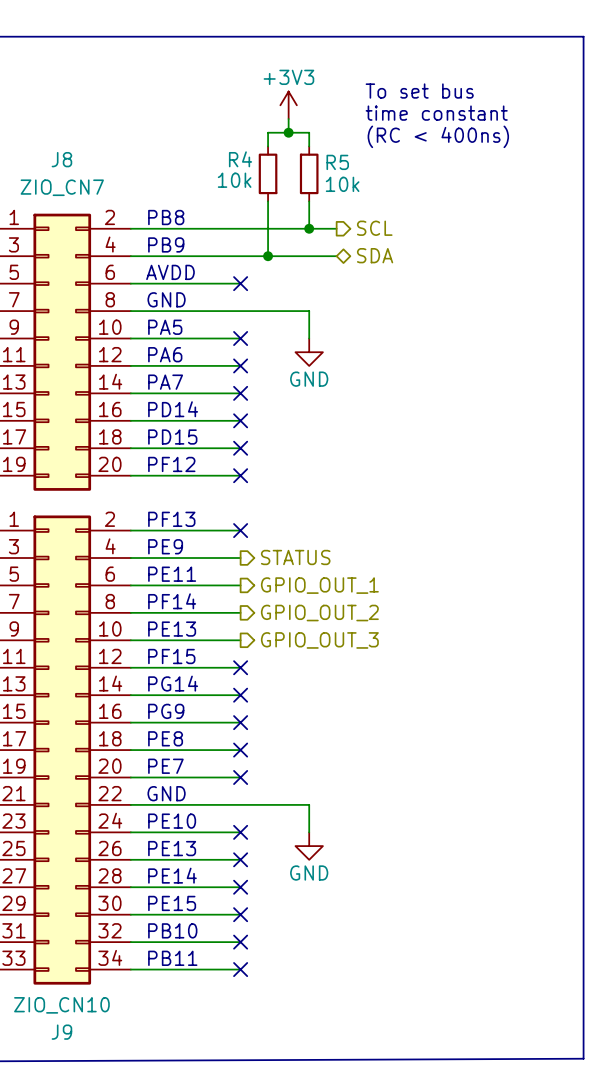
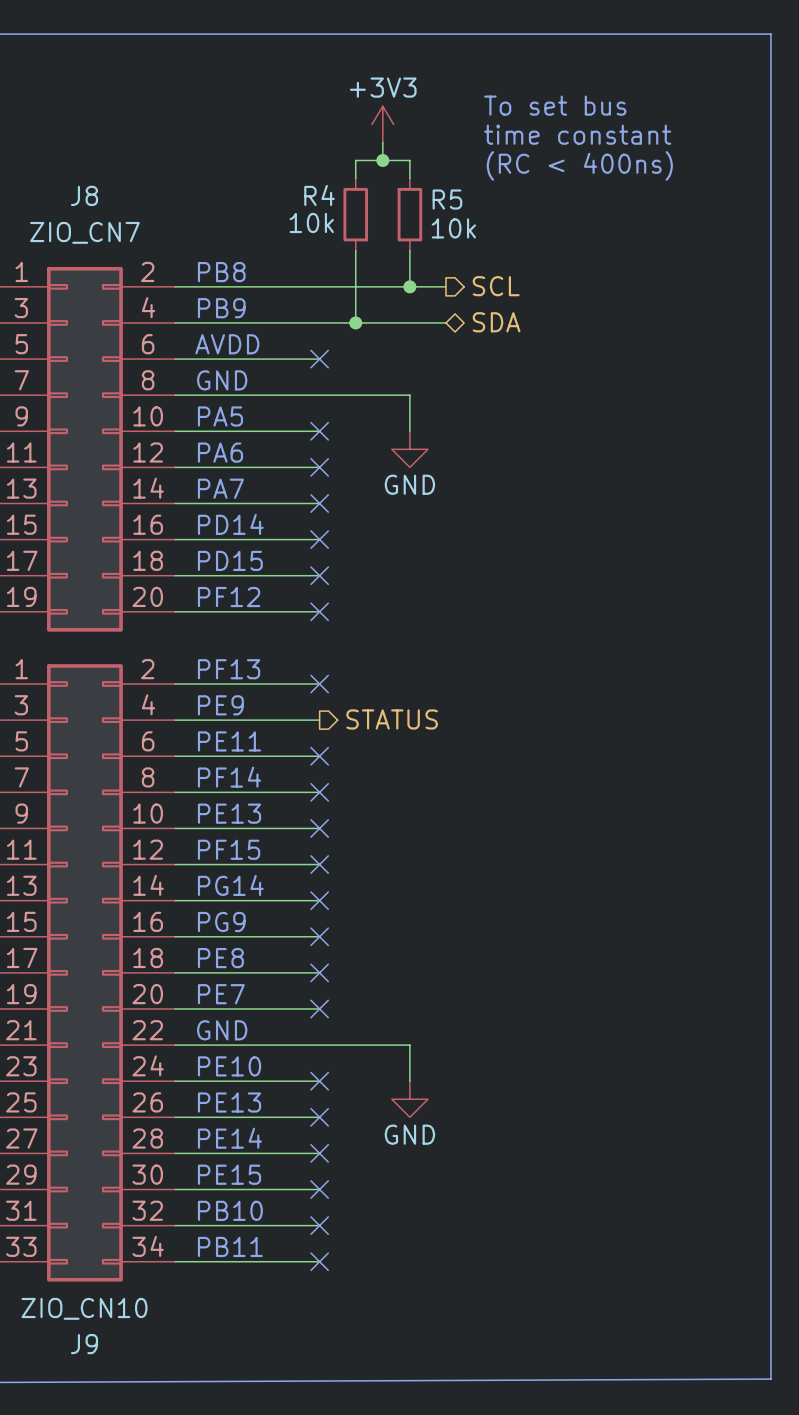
no-connect mark: none -> (319, 756)
hierarchical label: GPIO_OUT_1 (319, 585) -> none
no-connect mark: none -> (319, 792)
hierarchical label: GPIO_OUT_2 (319, 613) -> none
no-connect mark: none -> (319, 828)
hierarchical label: GPIO_OUT_3 (319, 640) -> none

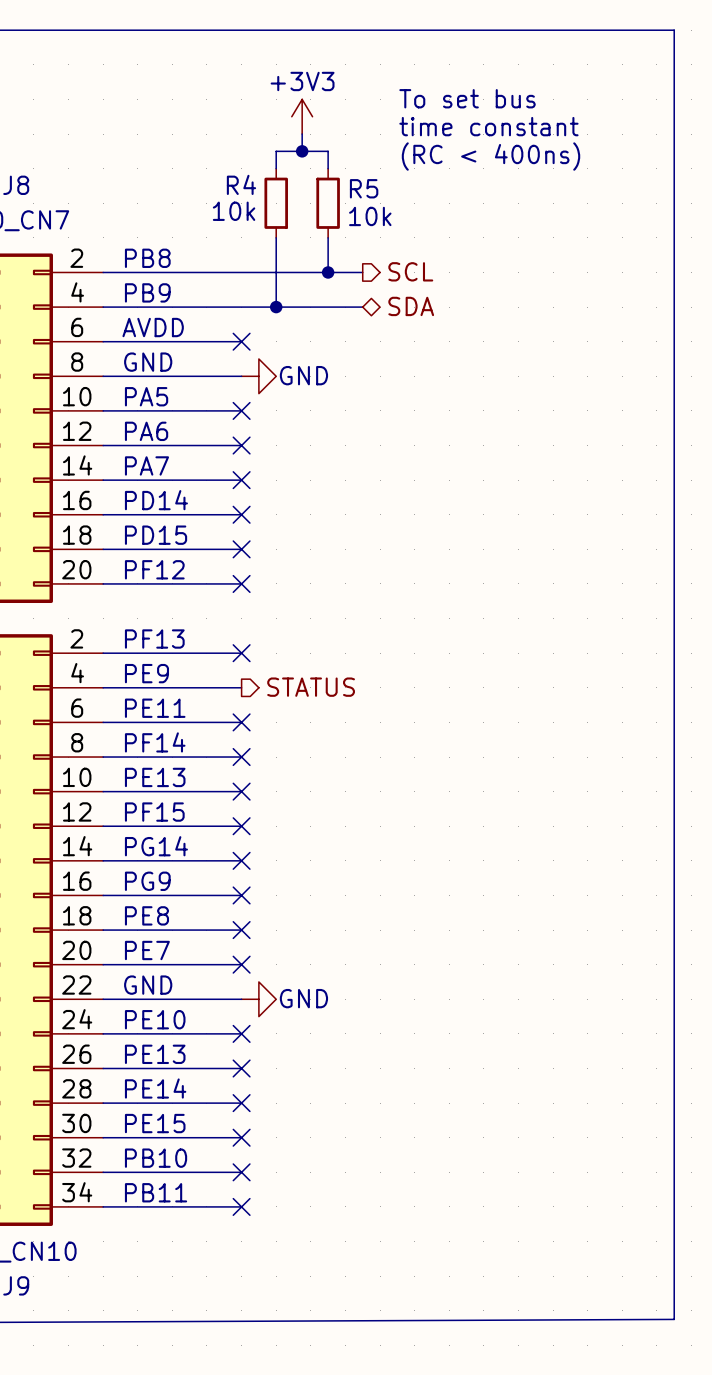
wire: (319, 395) (409, 395) (409, 431) -> none
power symbol rotation: 0° (409, 449) -> 90° counterclockwise (258, 376)
power symbol position: GND (409, 449) -> GND (258, 376)
wire: (319, 1045) (409, 1045) (409, 1081) -> none
power symbol rotation: 0° (409, 1099) -> 90° counterclockwise (258, 999)
power symbol position: GND (409, 1099) -> GND (258, 999)

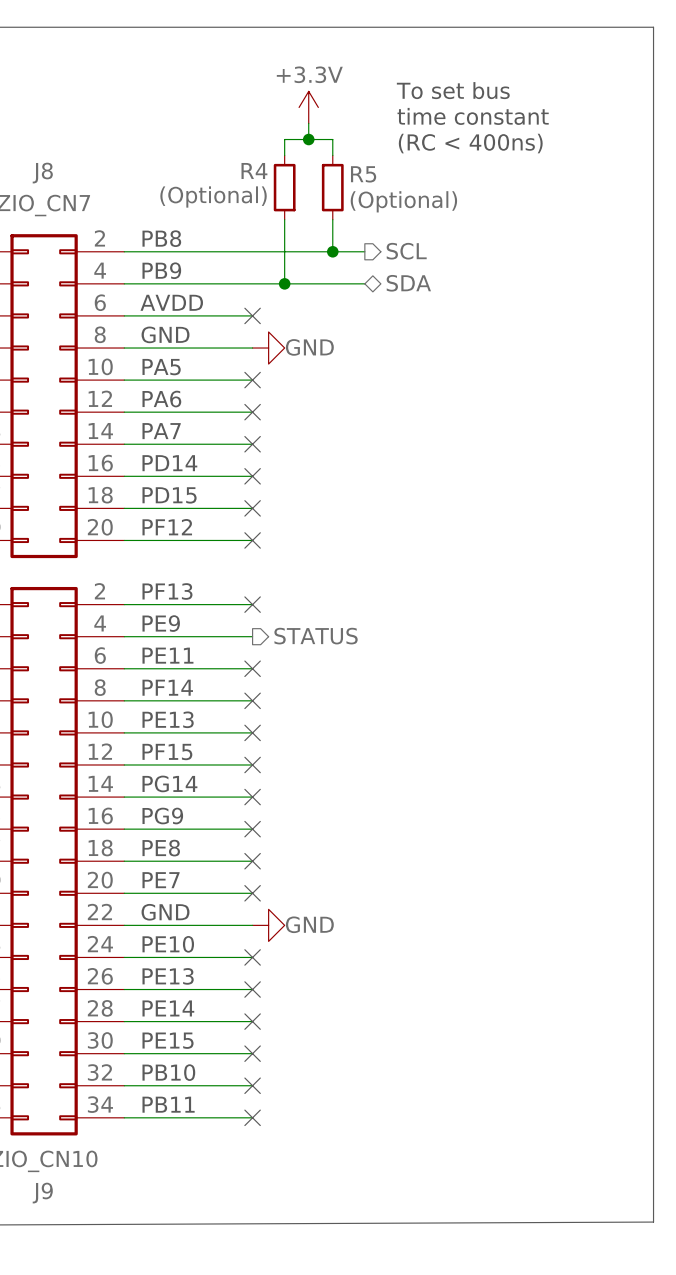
power symbol: +3V3 (302, 116) -> +3.3V (308, 107)
R4 value: 10k (234, 211) -> (Optional) (213, 197)
R5 value: 10k (370, 216) -> (Optional) (403, 201)

